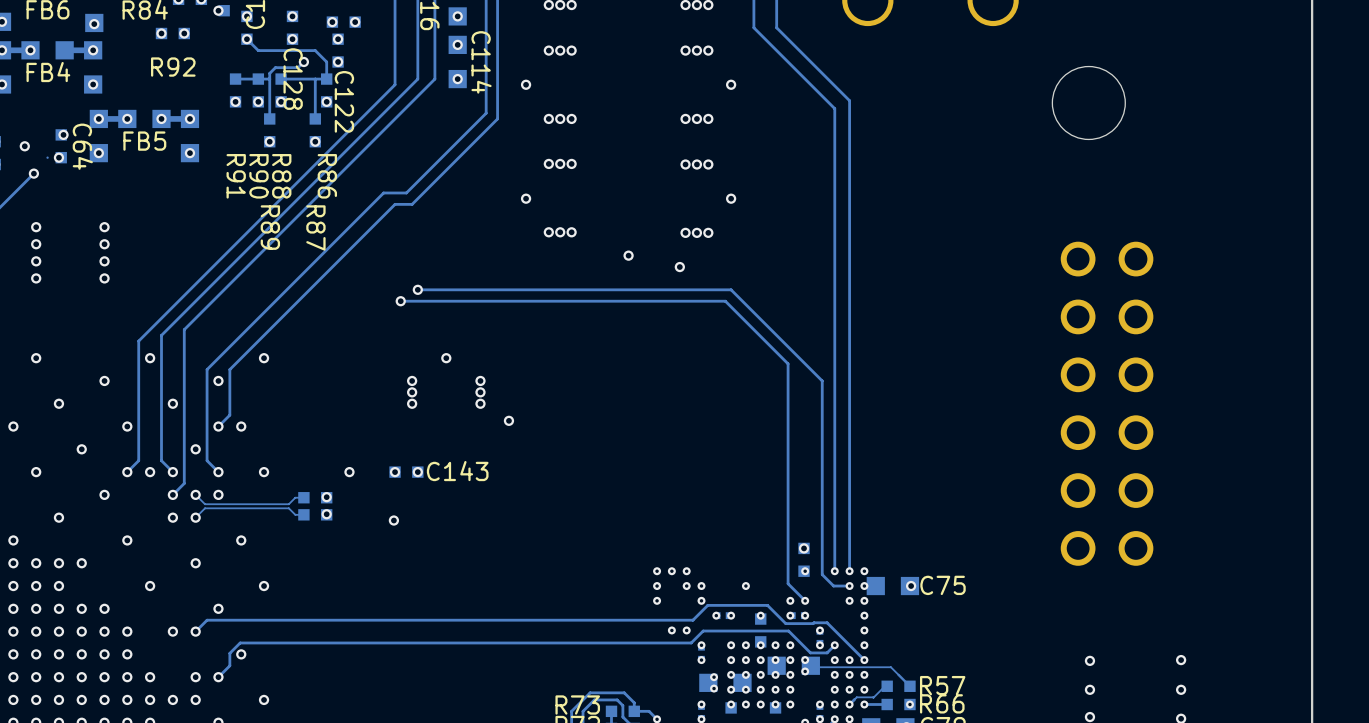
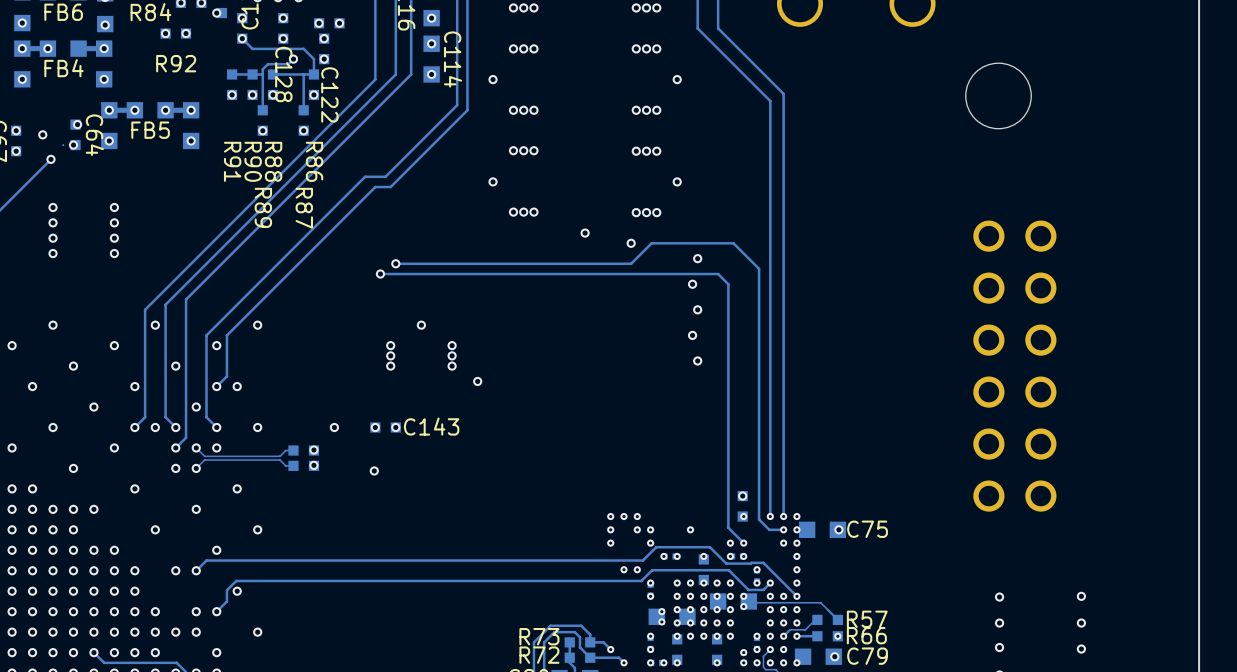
via: none -> (697, 258)
track: (679, 289) (731, 289) (822, 380) -> (631, 263) (651, 243) (733, 243) (759, 268) (759, 345)
track: (725, 301) (788, 363) -> (672, 274) (718, 274) (728, 284) (728, 330)
via: none -> (692, 284)
via: none -> (697, 309)
via: none -> (692, 335)
via: none -> (697, 360)

